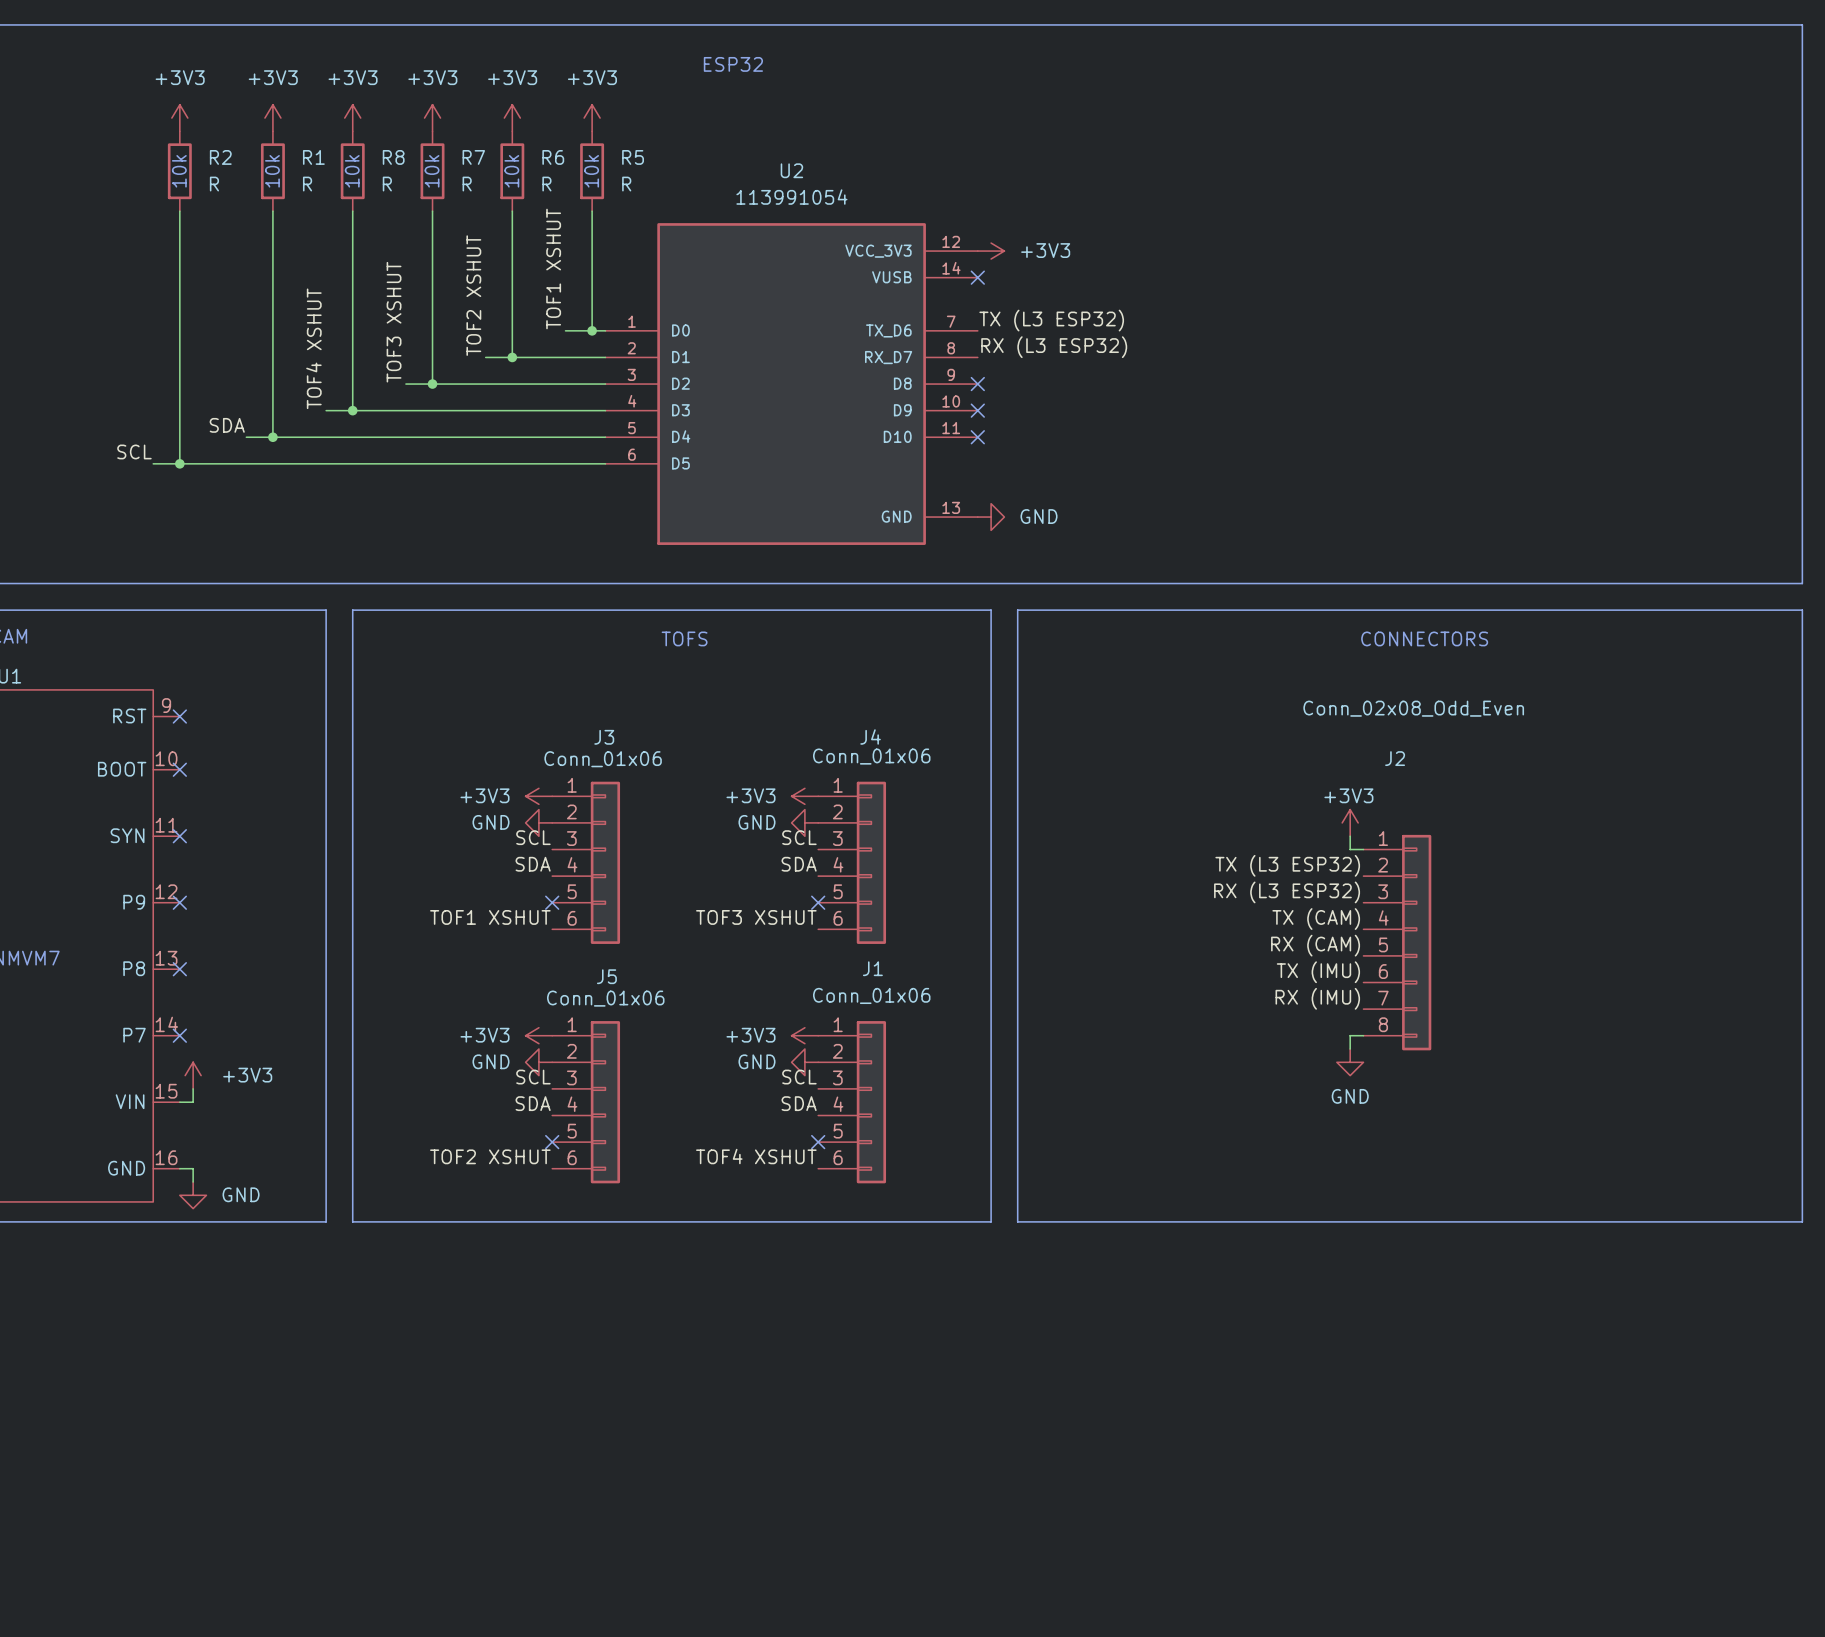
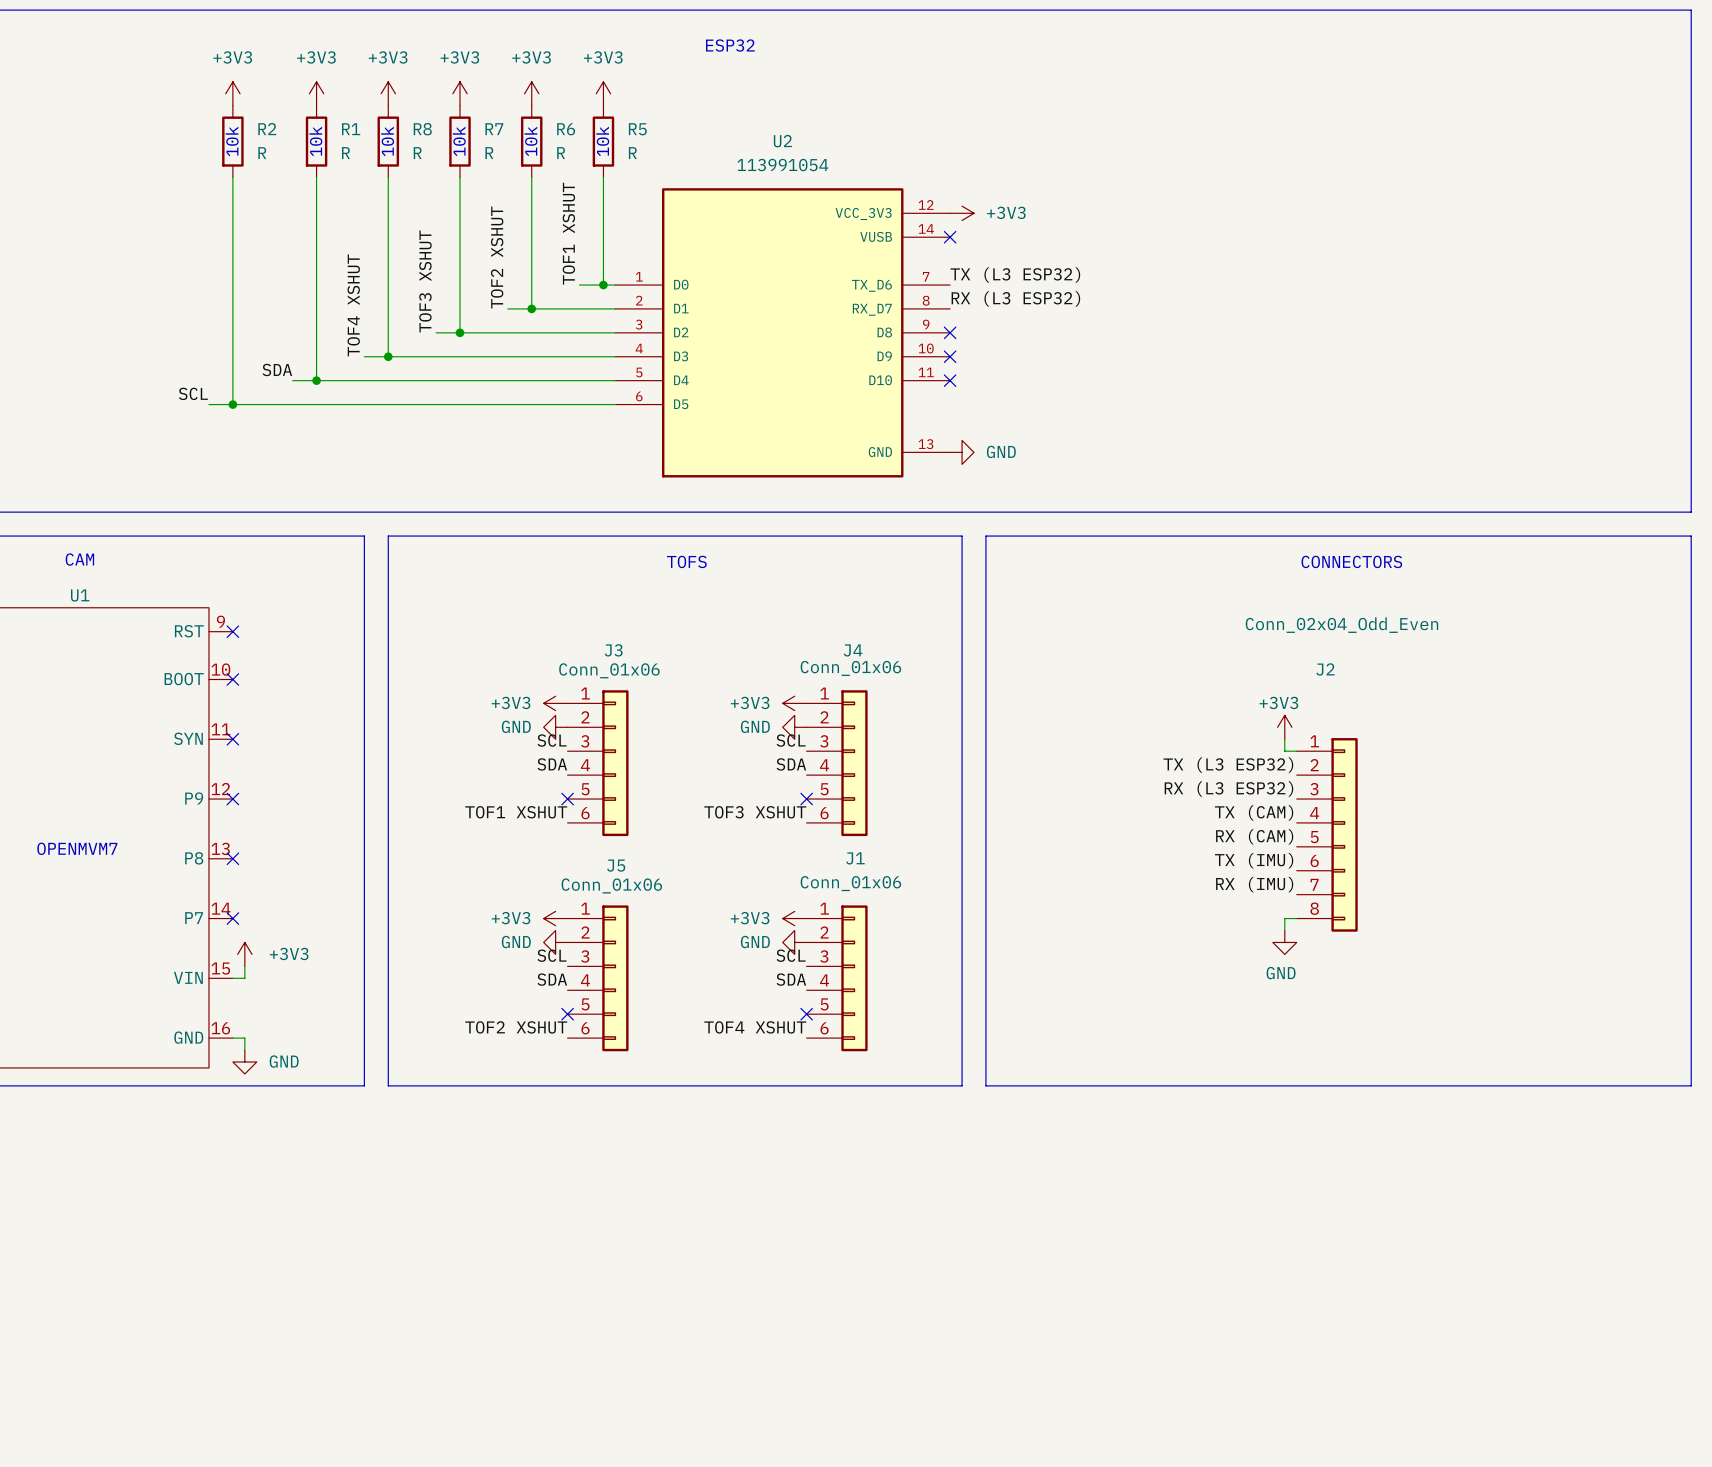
J2 value: Conn_02x08_Odd_Even (1413, 708) -> Conn_02x04_Odd_Even (1341, 625)

